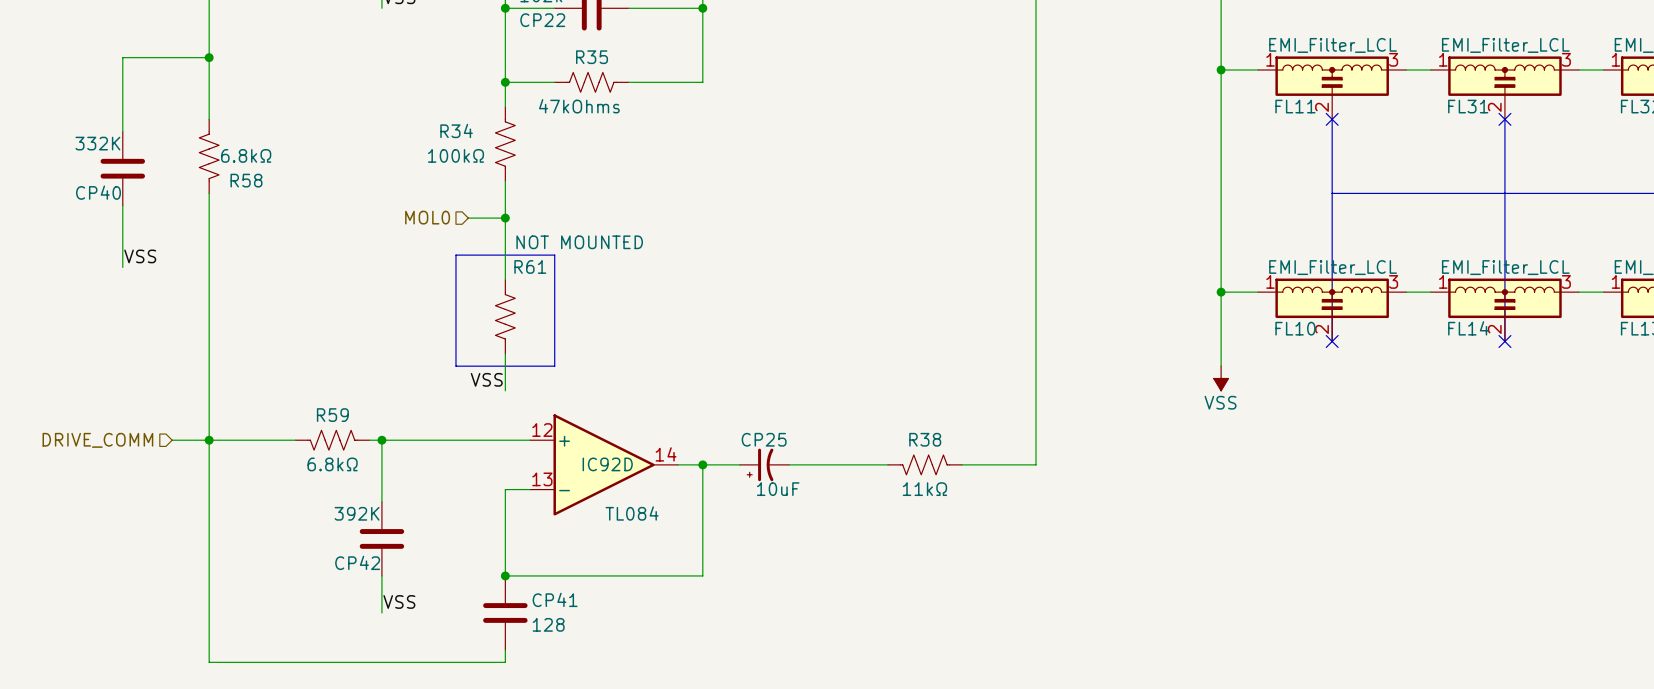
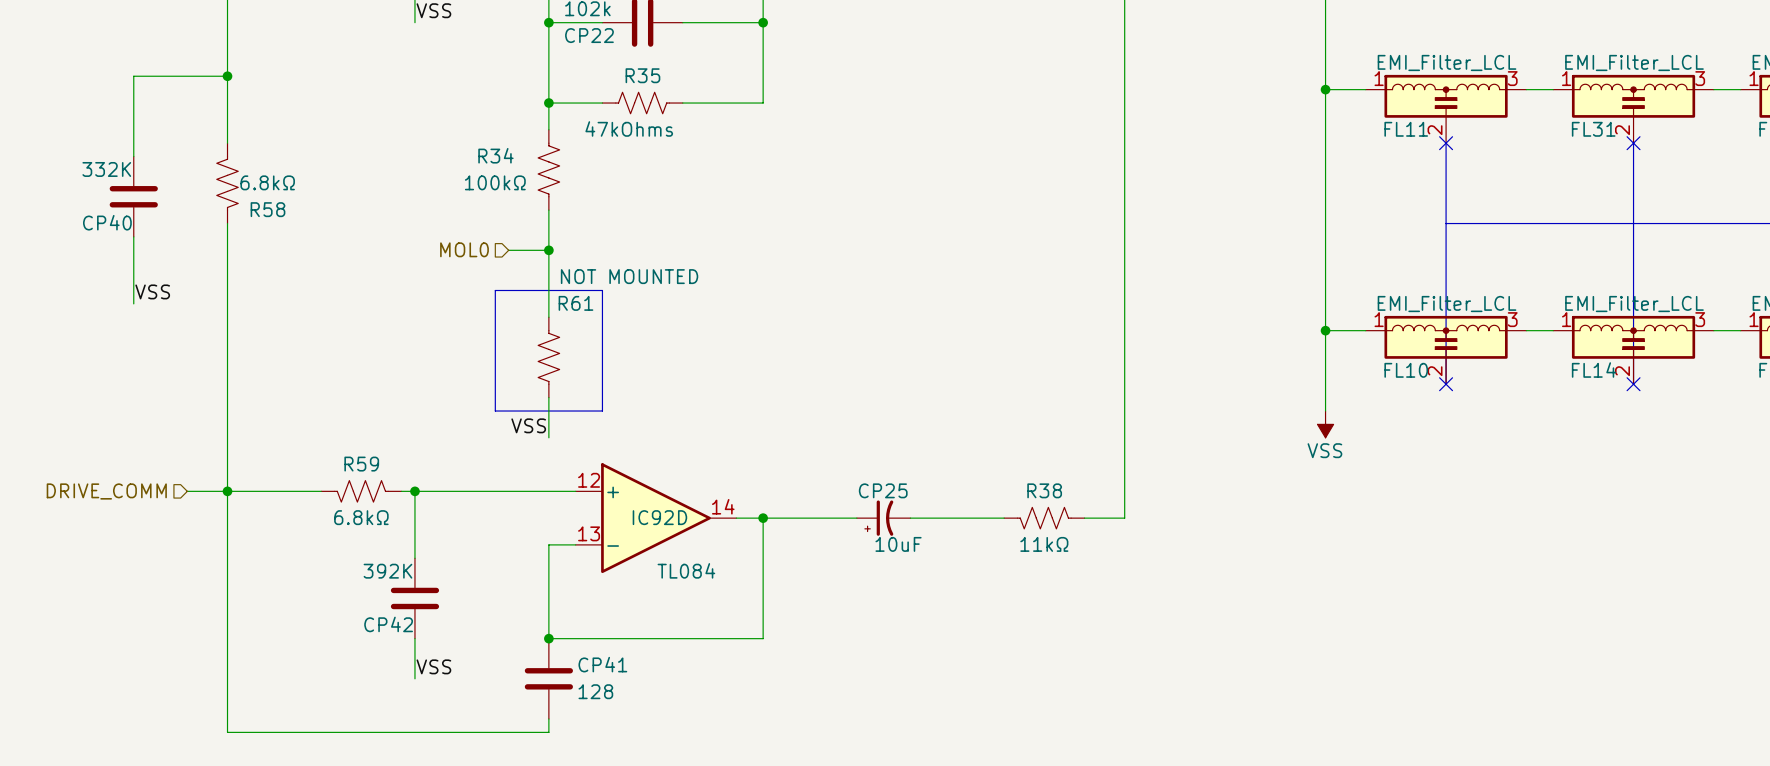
CP25 position: (764, 464) -> (883, 518)
R38 position: (924, 464) -> (1044, 518)

